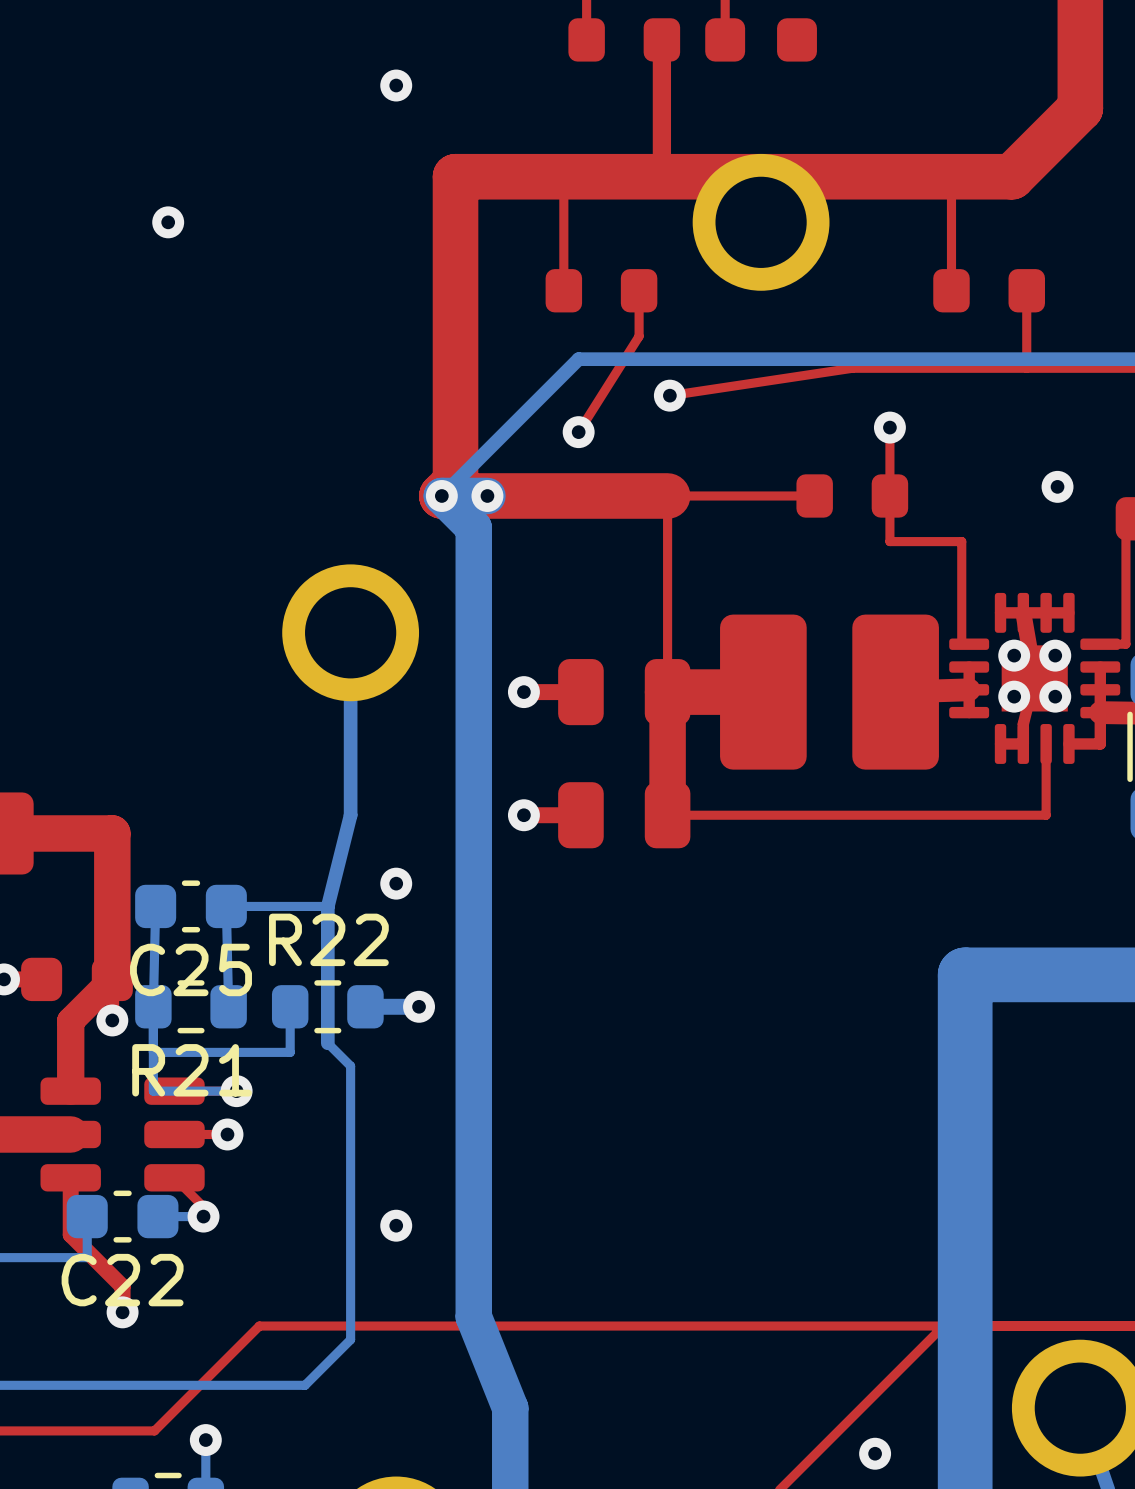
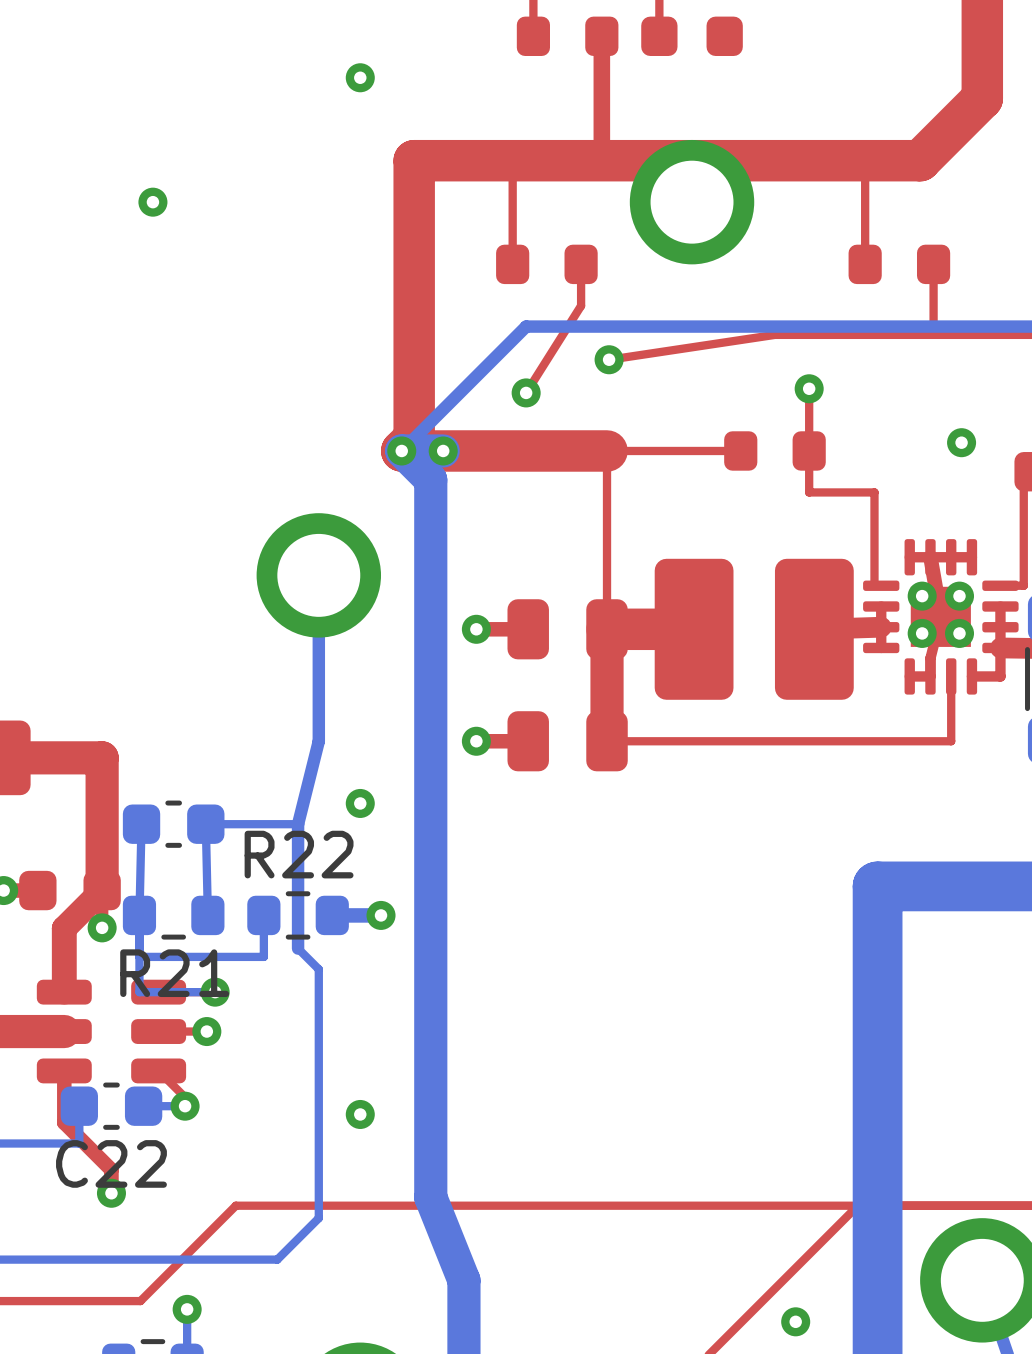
C25 name: C25 (191, 969) -> none
R21 footprint: [135, 980, 247, 1034] -> [122, 895, 225, 940]

